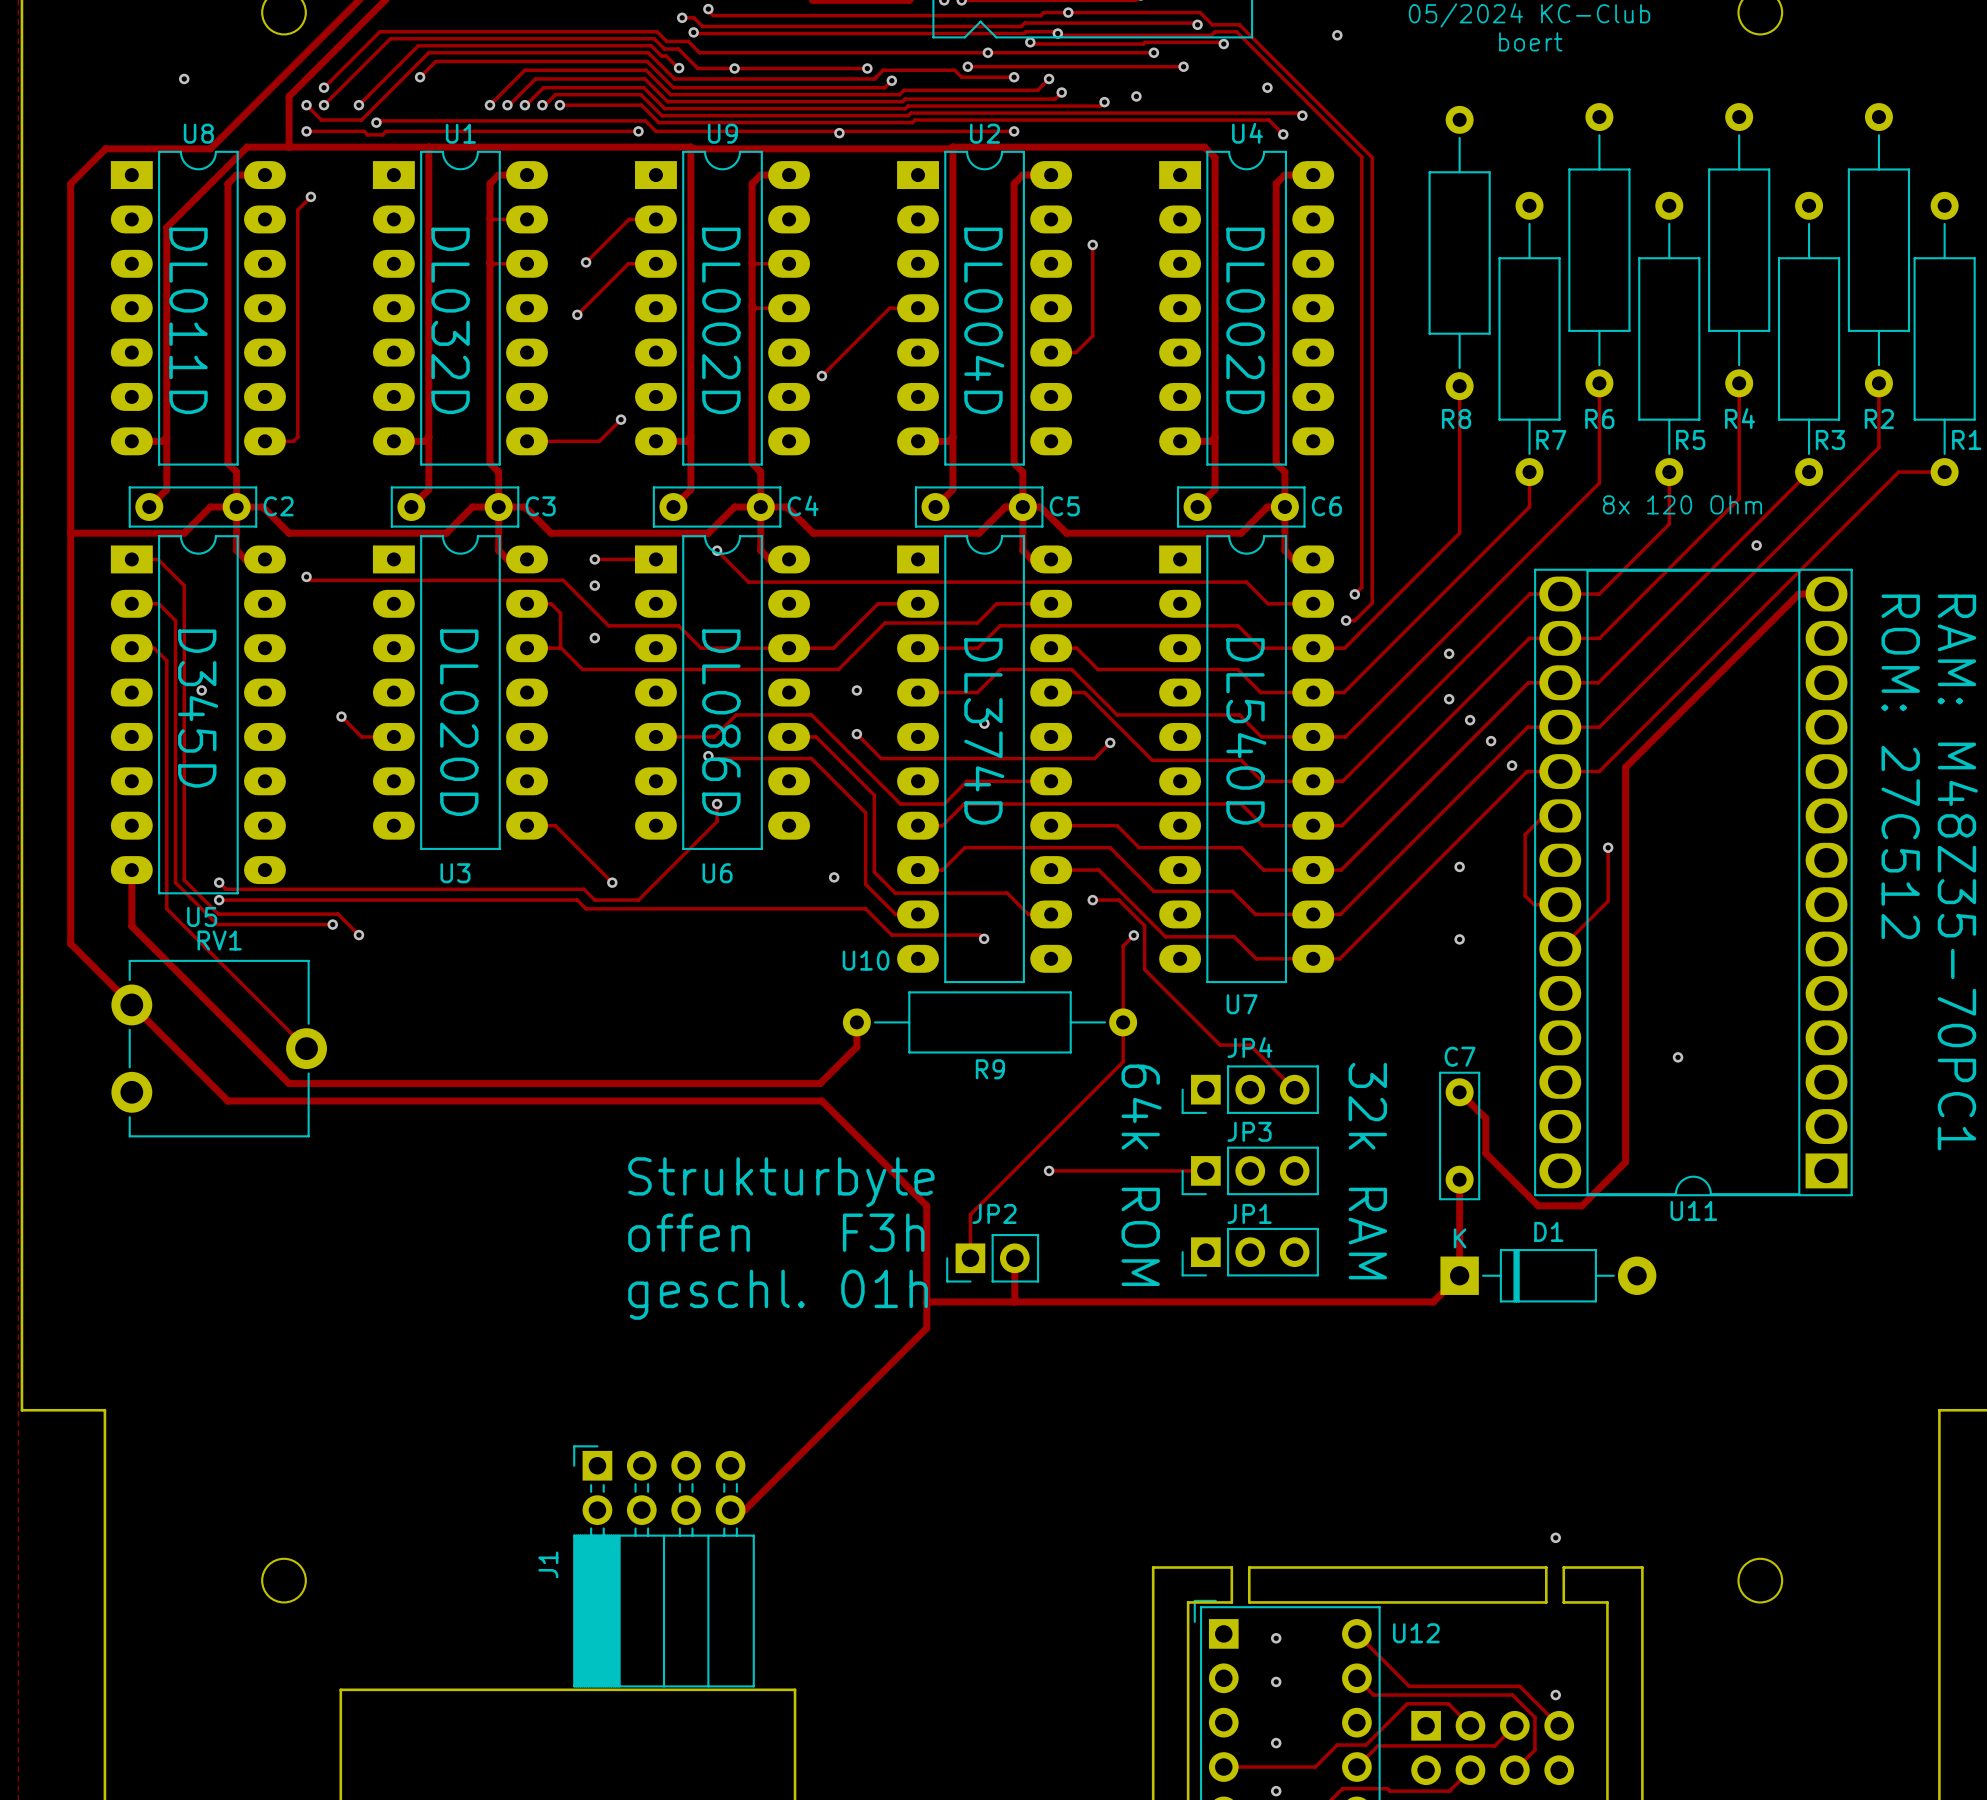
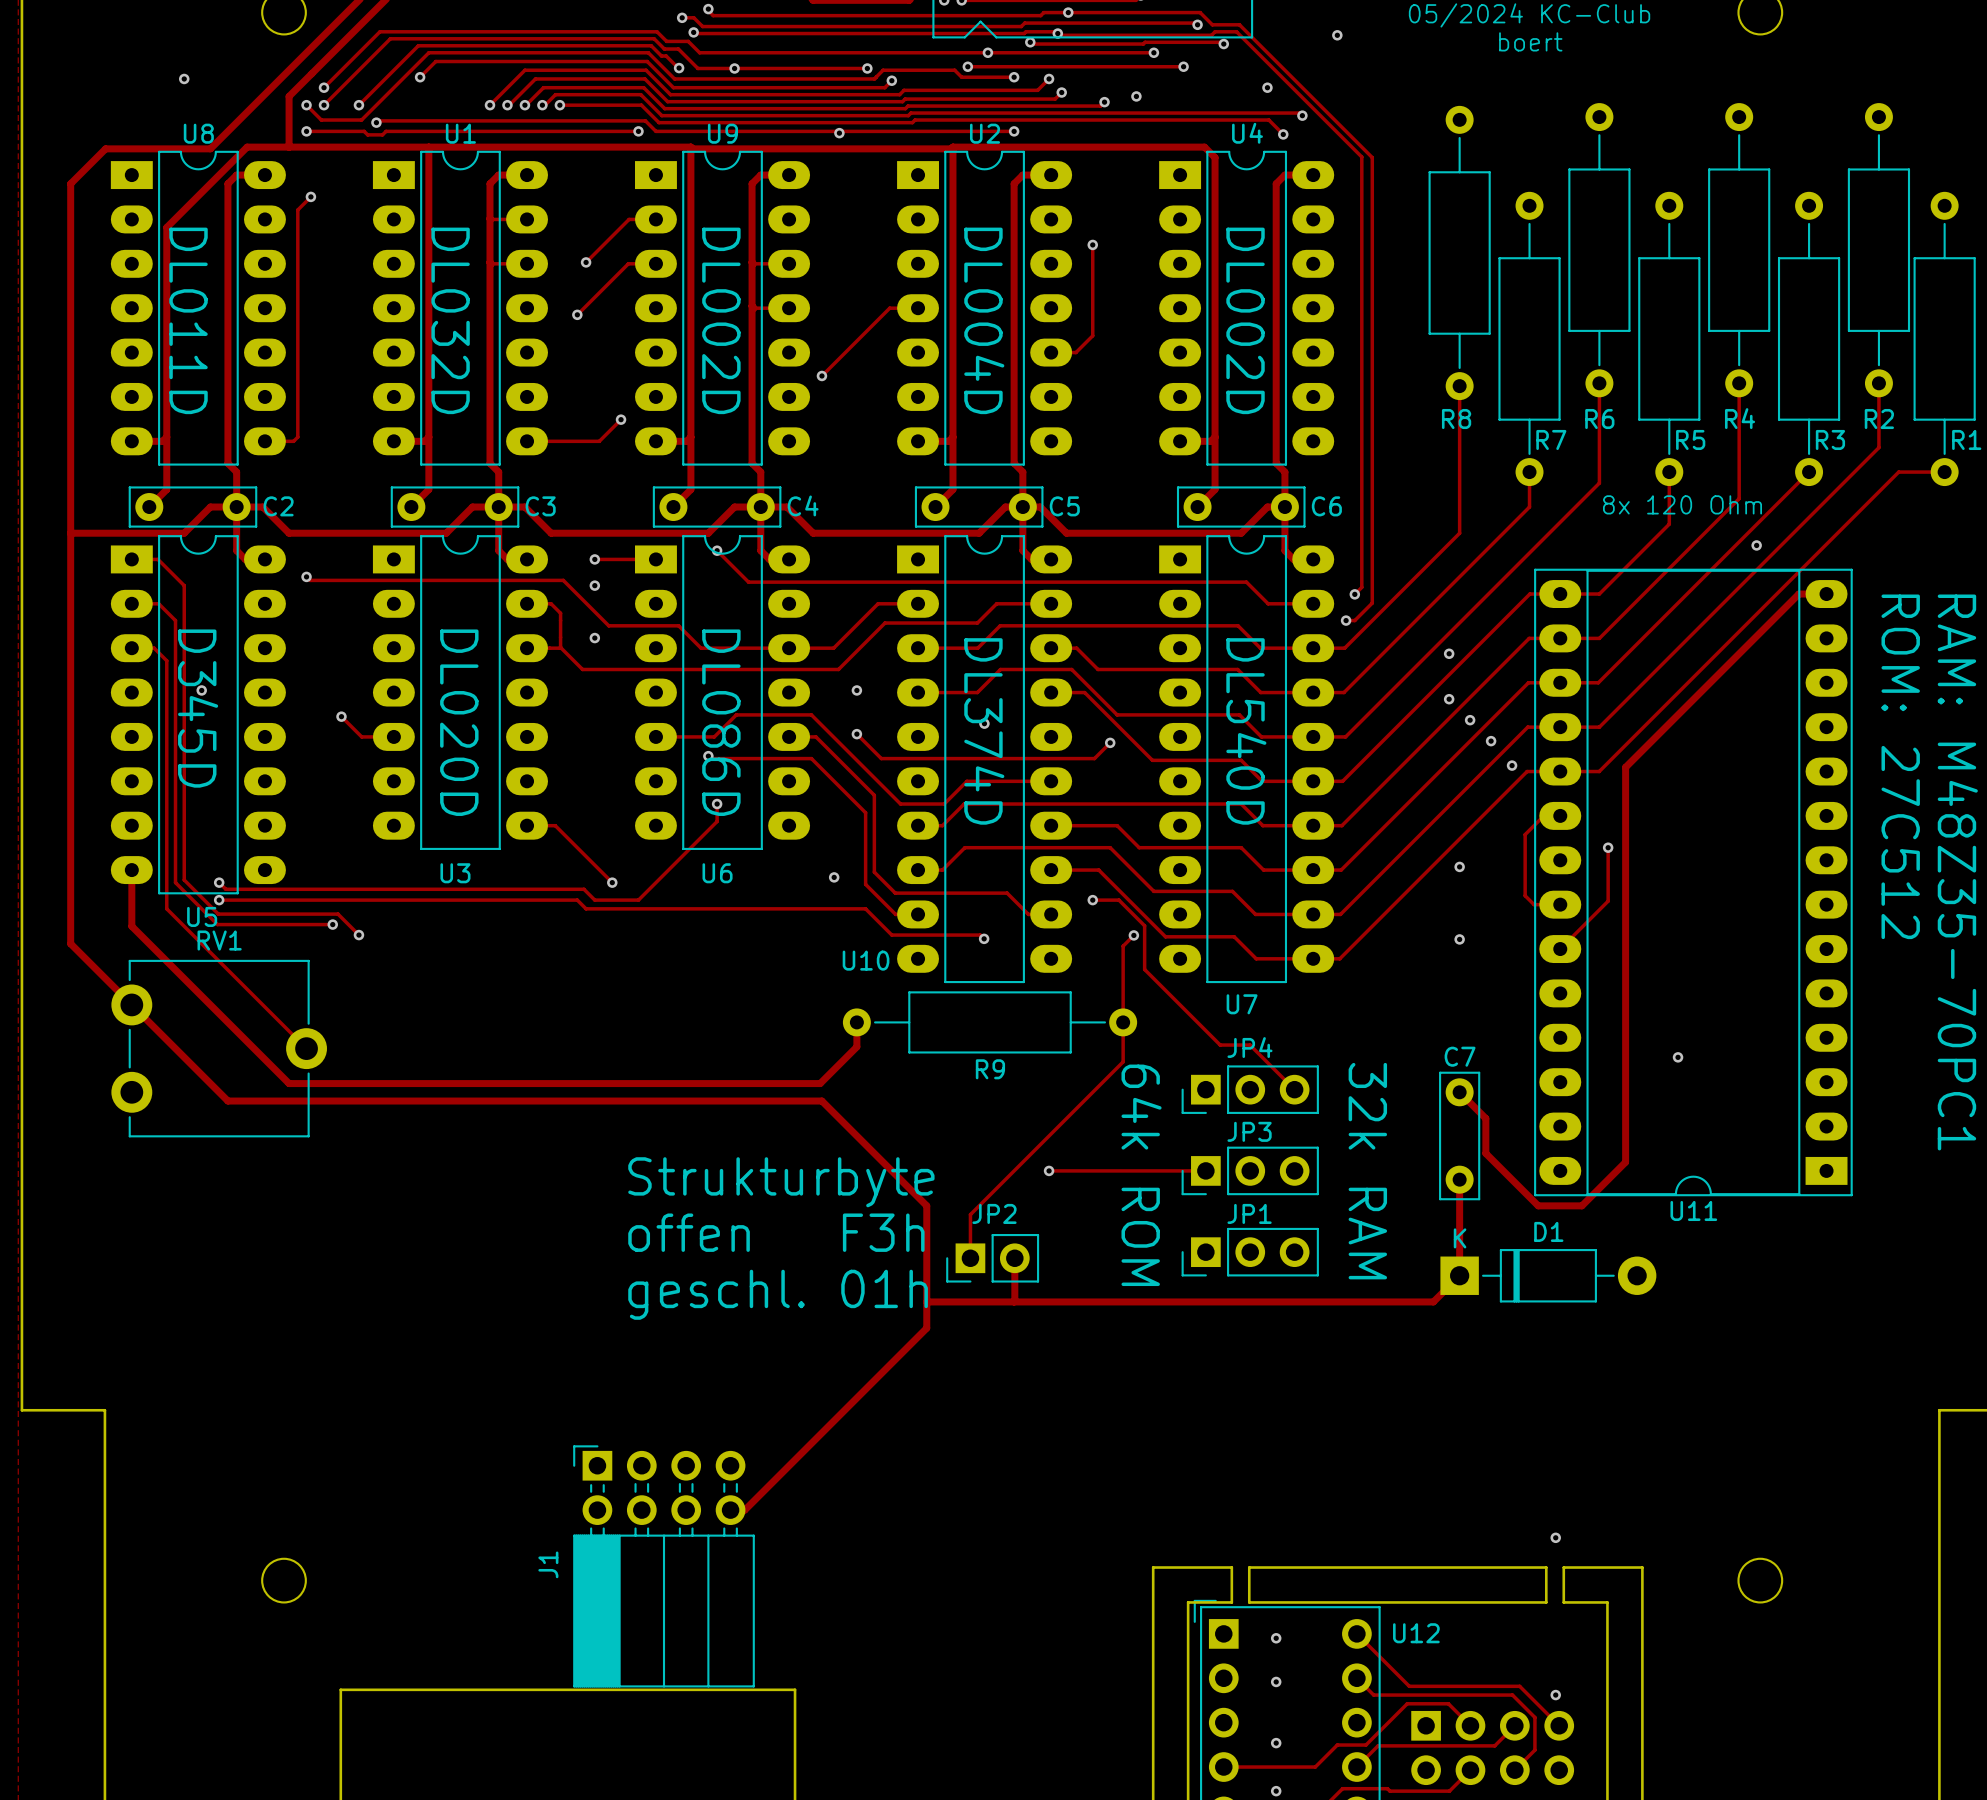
U11 footprint: [1534, 568, 1853, 1197] -> [1534, 568, 1853, 1197]

